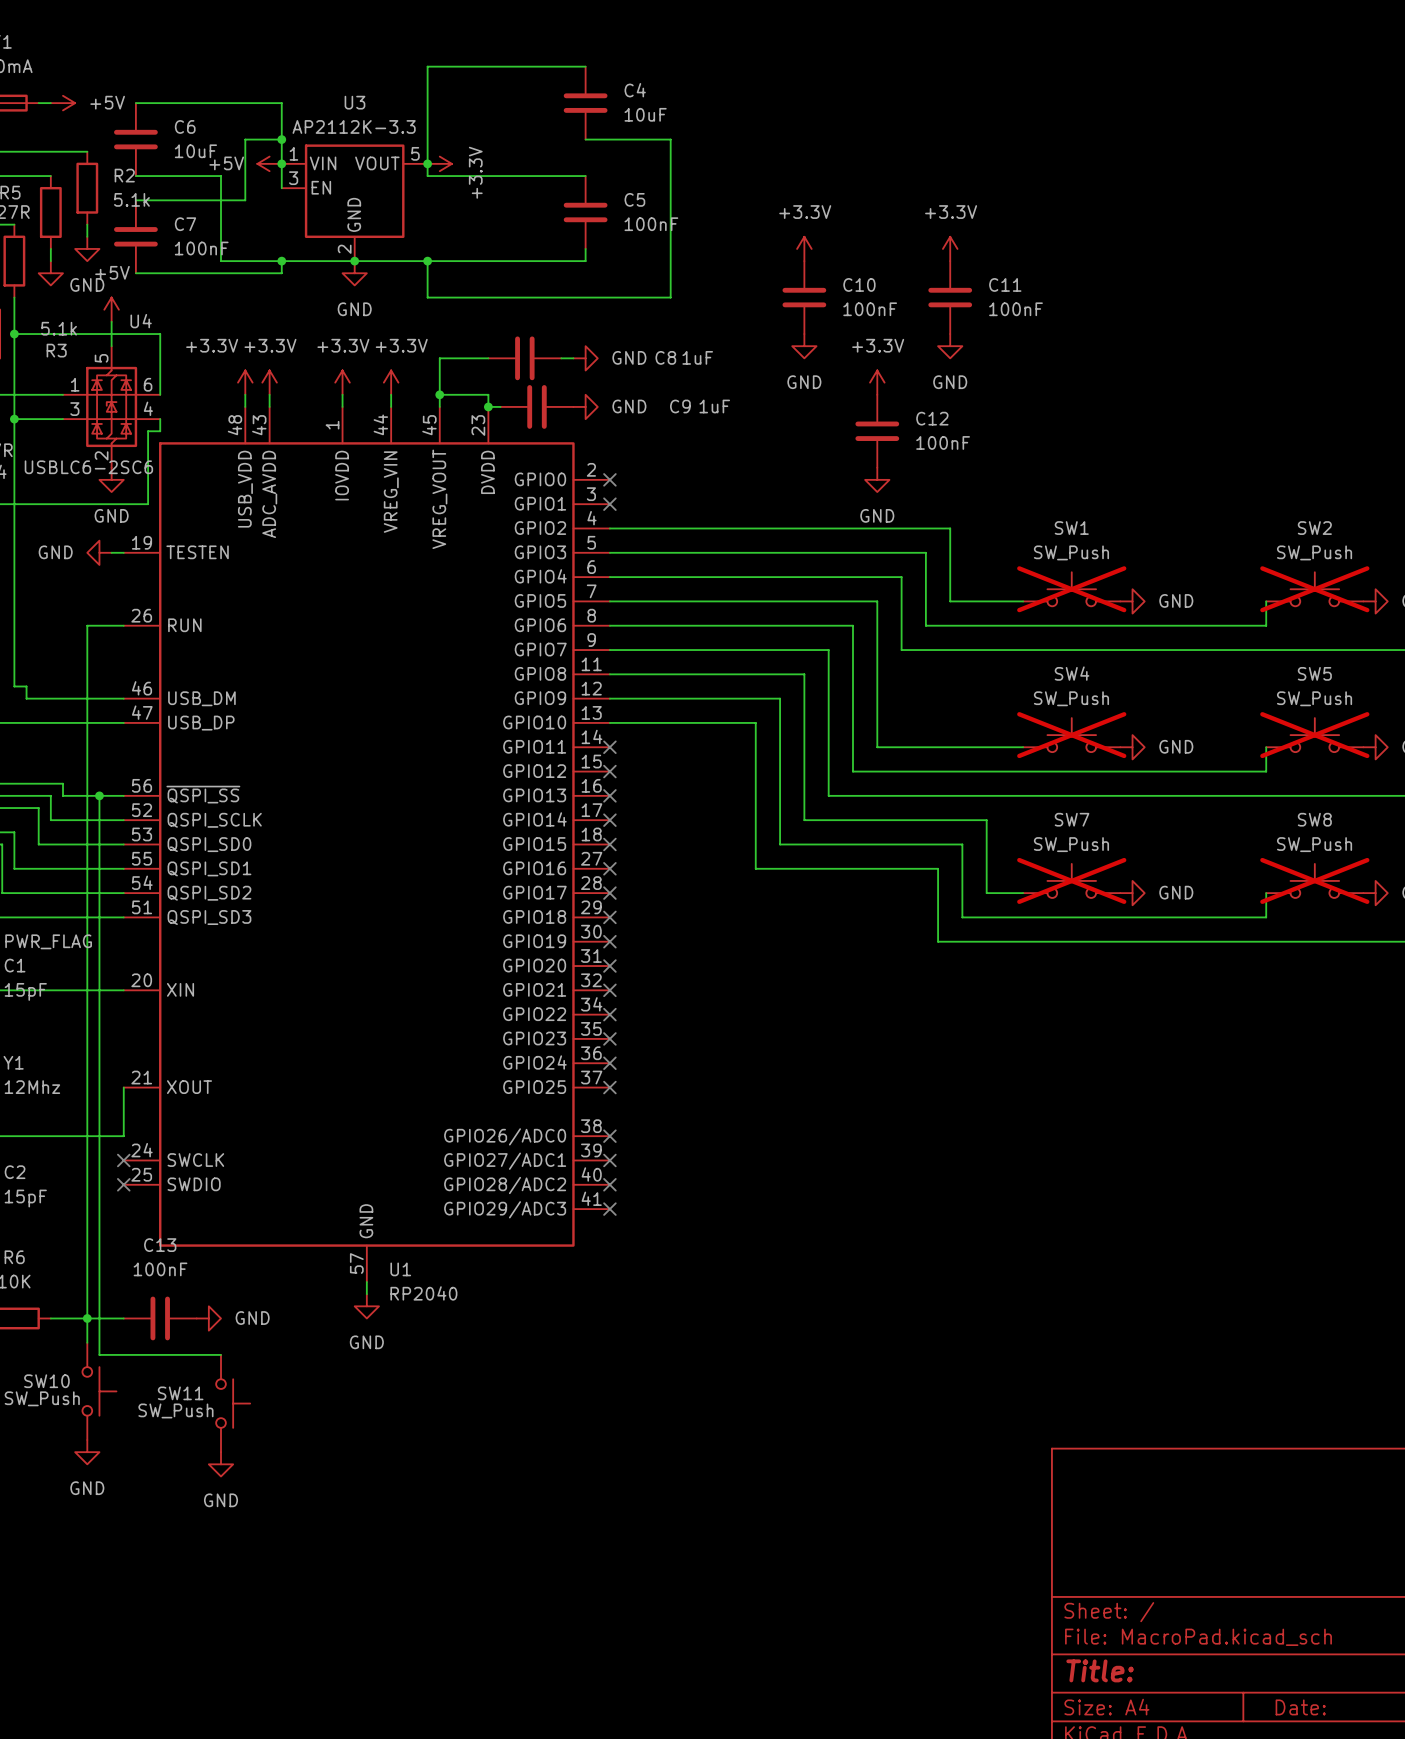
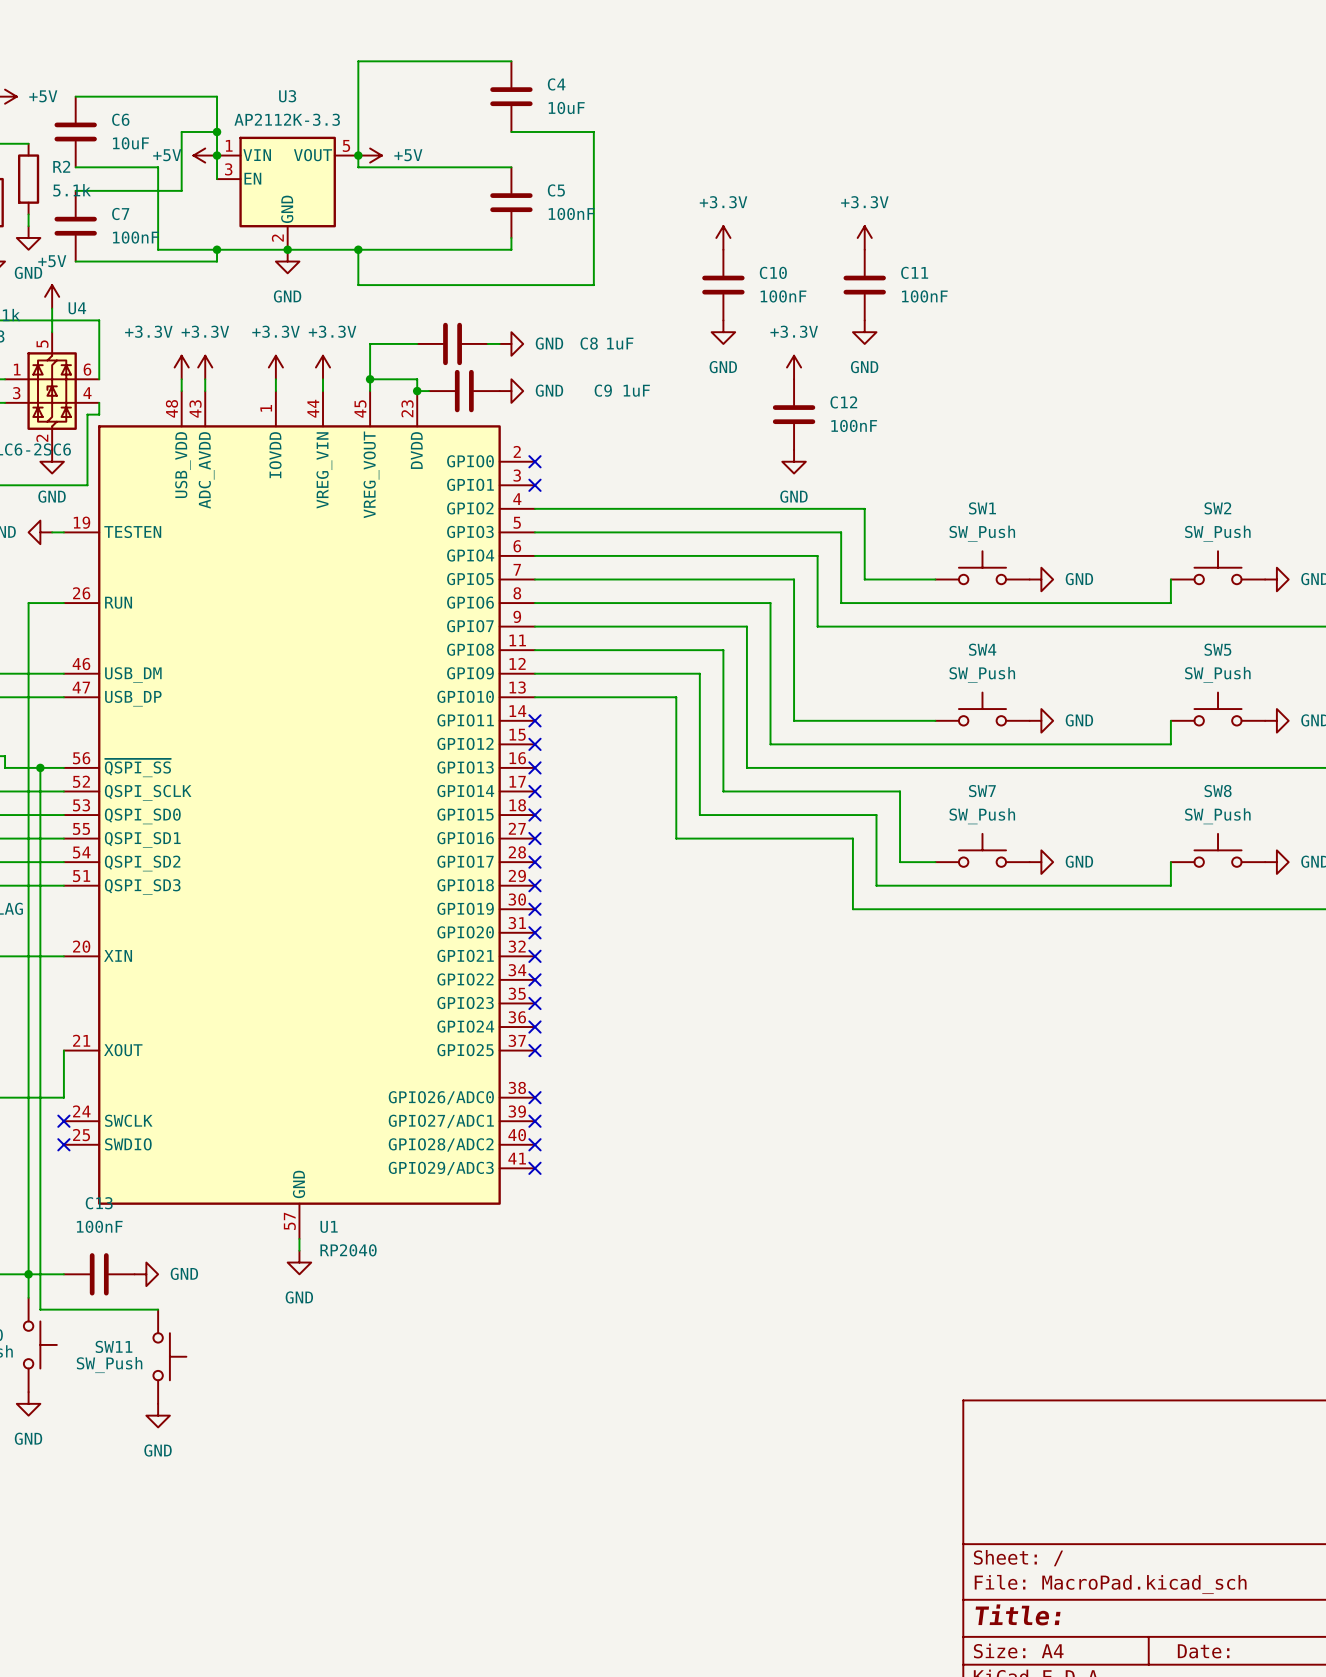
power symbol: +3.3V (439, 163) -> +5V (370, 155)
SW1 do-not-place cross: (1071, 589) -> none
SW2 do-not-place cross: (1314, 589) -> none
SW4 do-not-place cross: (1071, 735) -> none
SW5 do-not-place cross: (1314, 735) -> none
SW7 do-not-place cross: (1071, 880) -> none
SW8 do-not-place cross: (1314, 880) -> none

